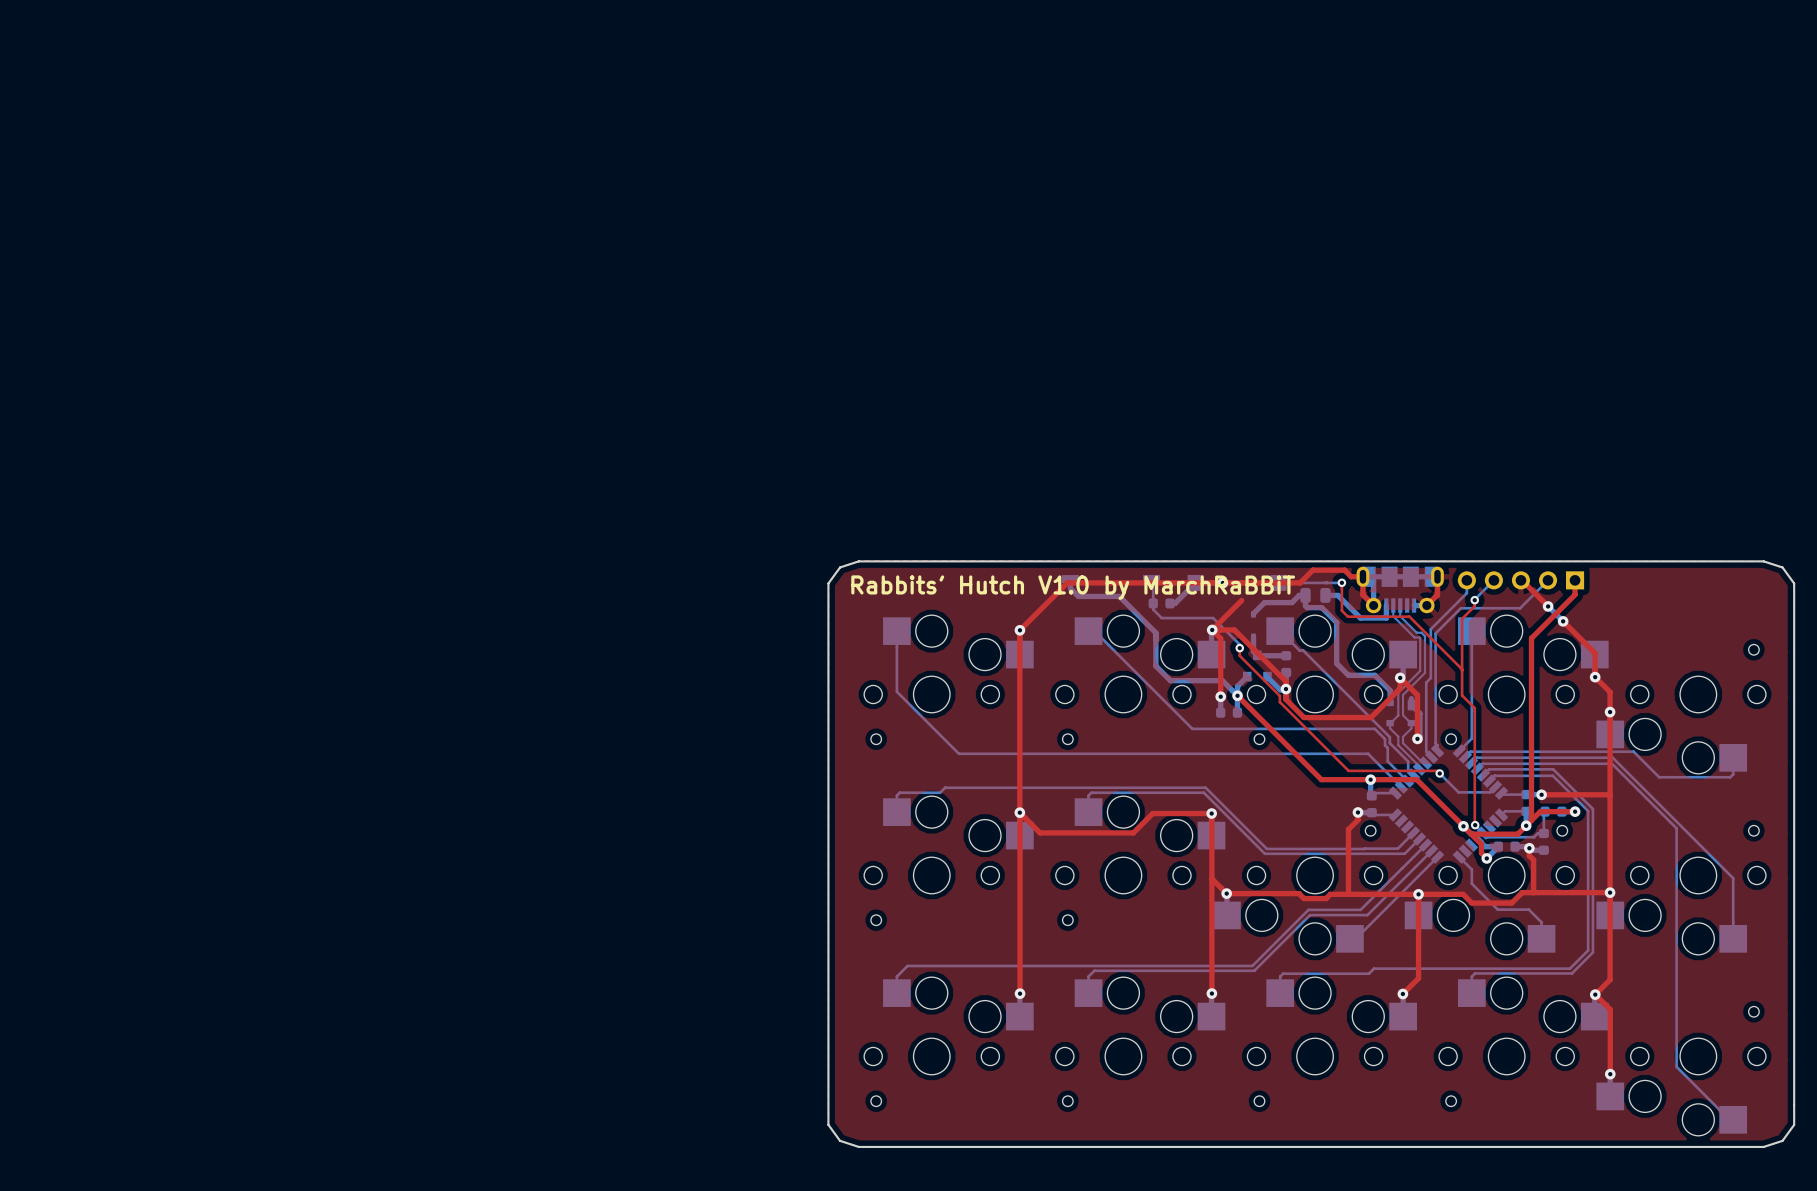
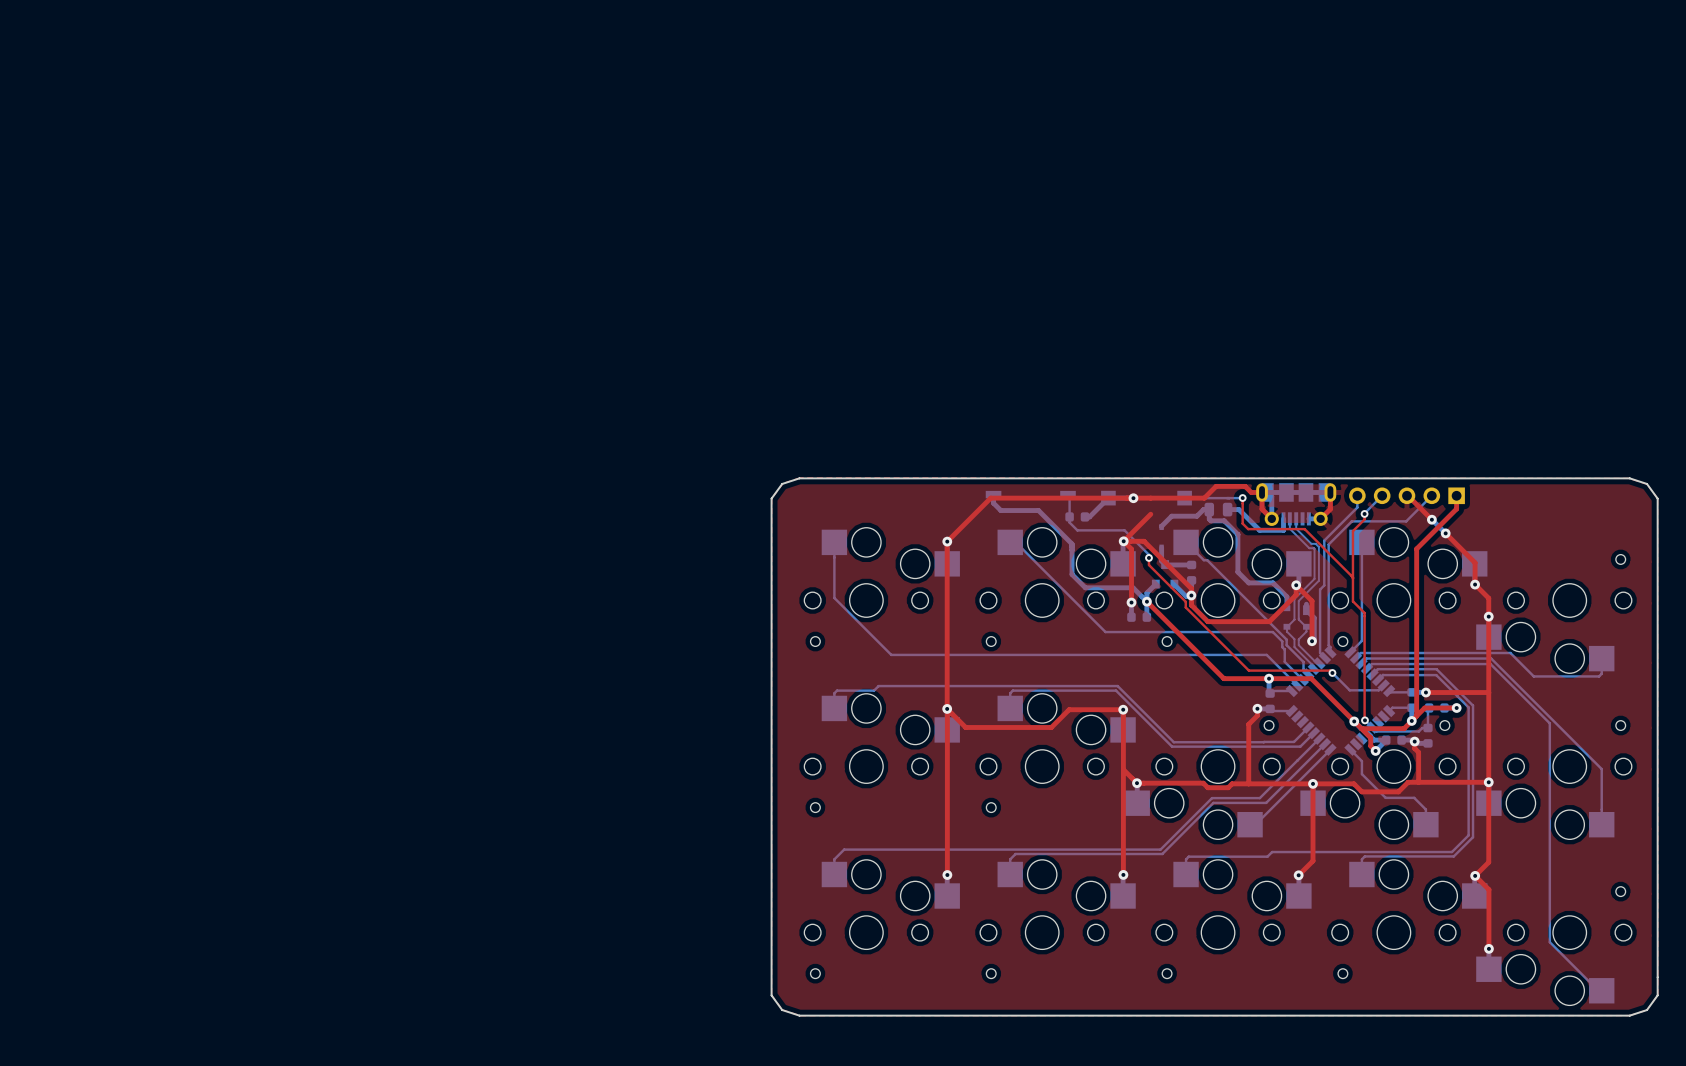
text: Rabbits' Hutch V1.0 (969, 584) -> none
text: by MarchRaBBiT (1200, 587) -> none

